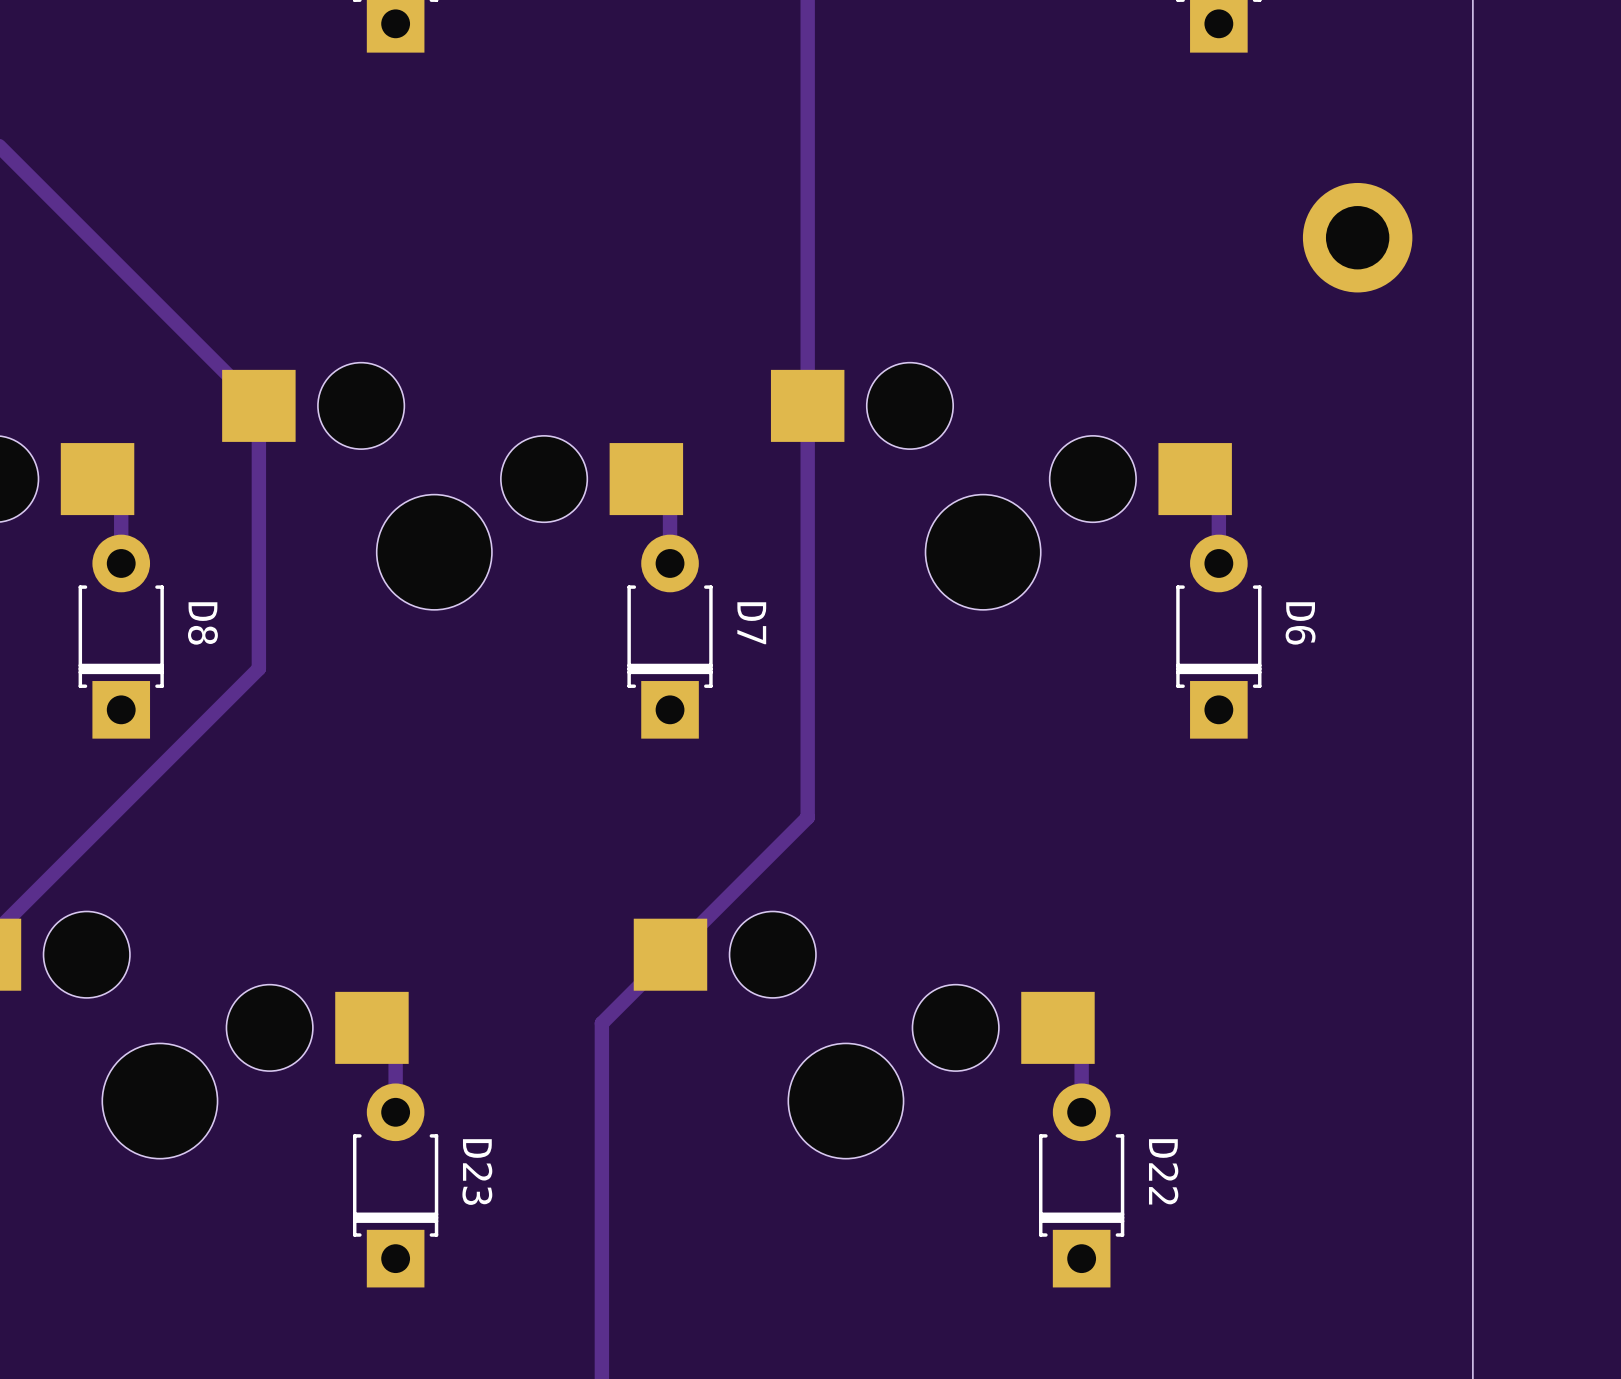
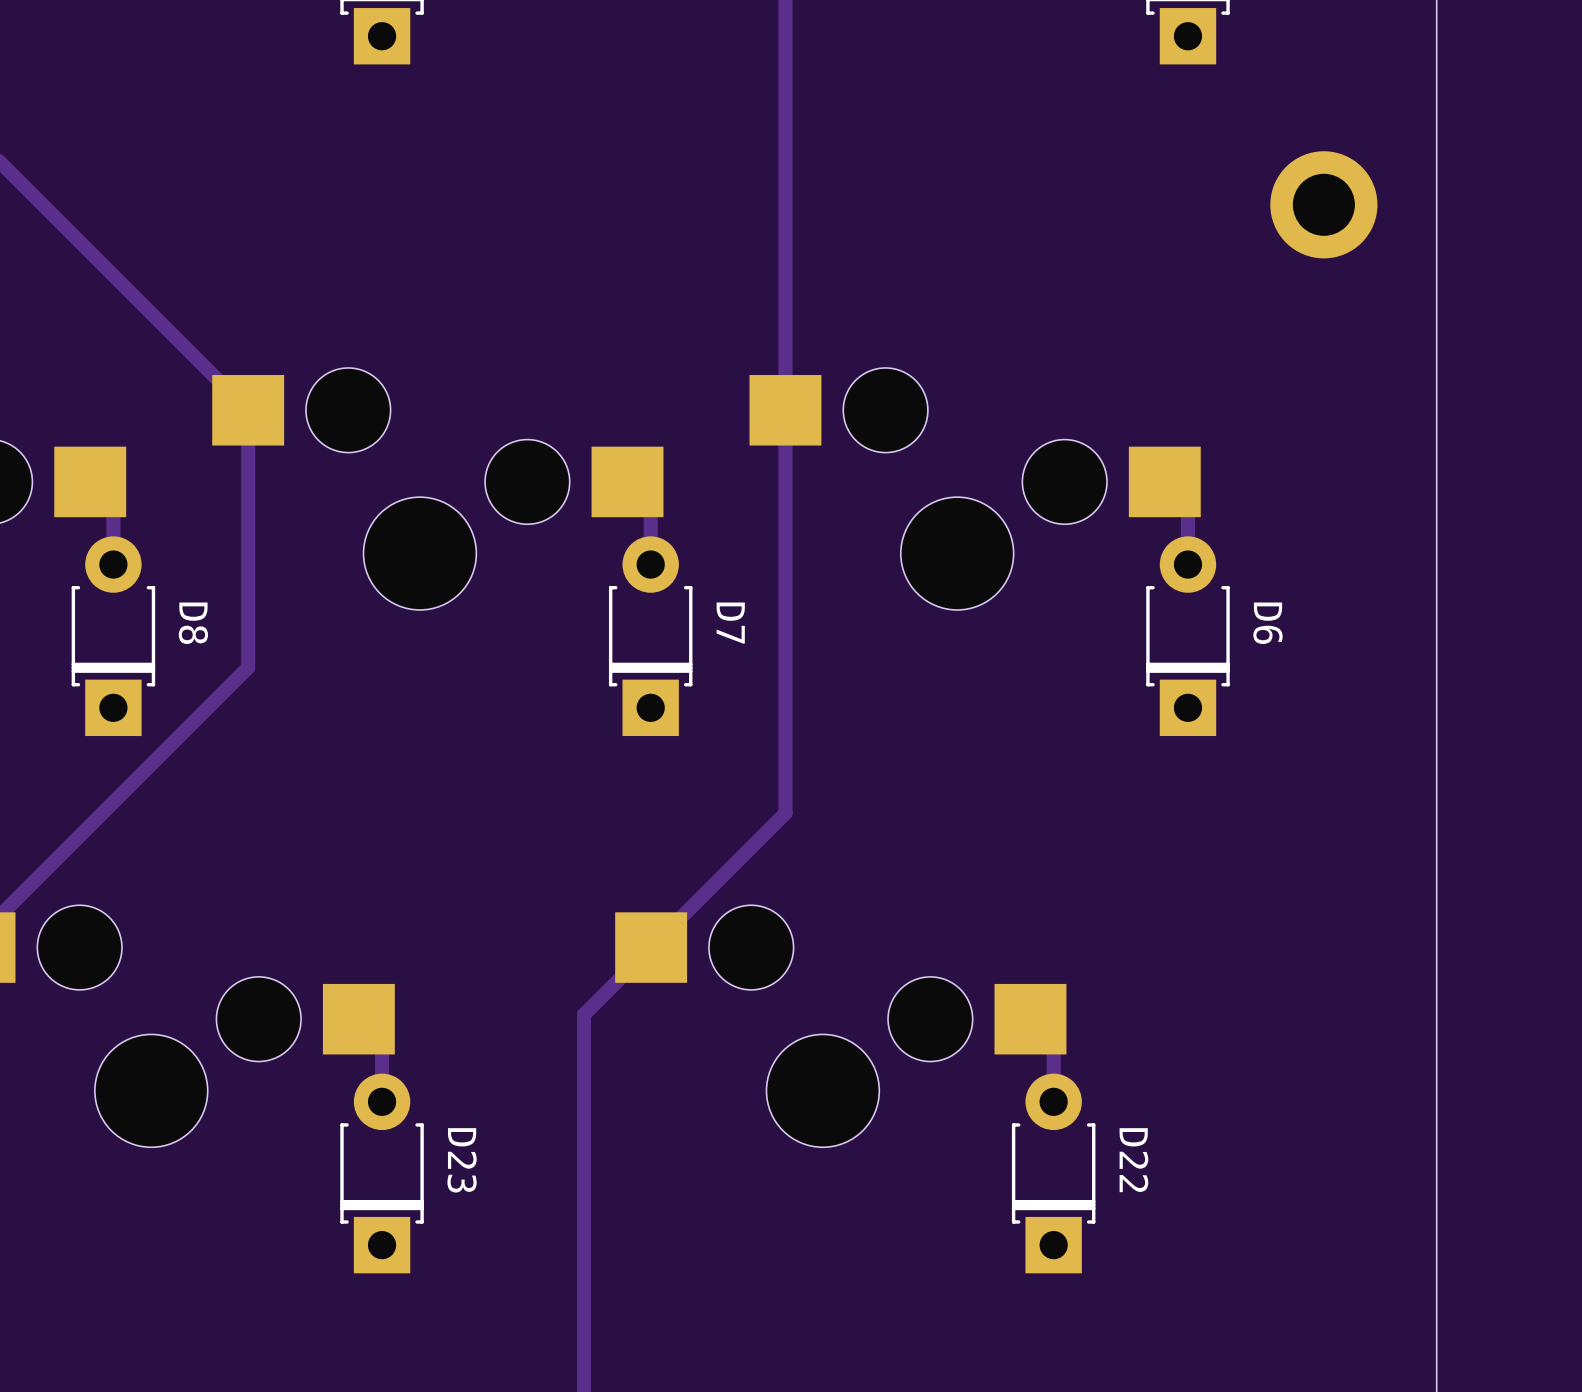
part position: (1357, 237) -> (1323, 204)

